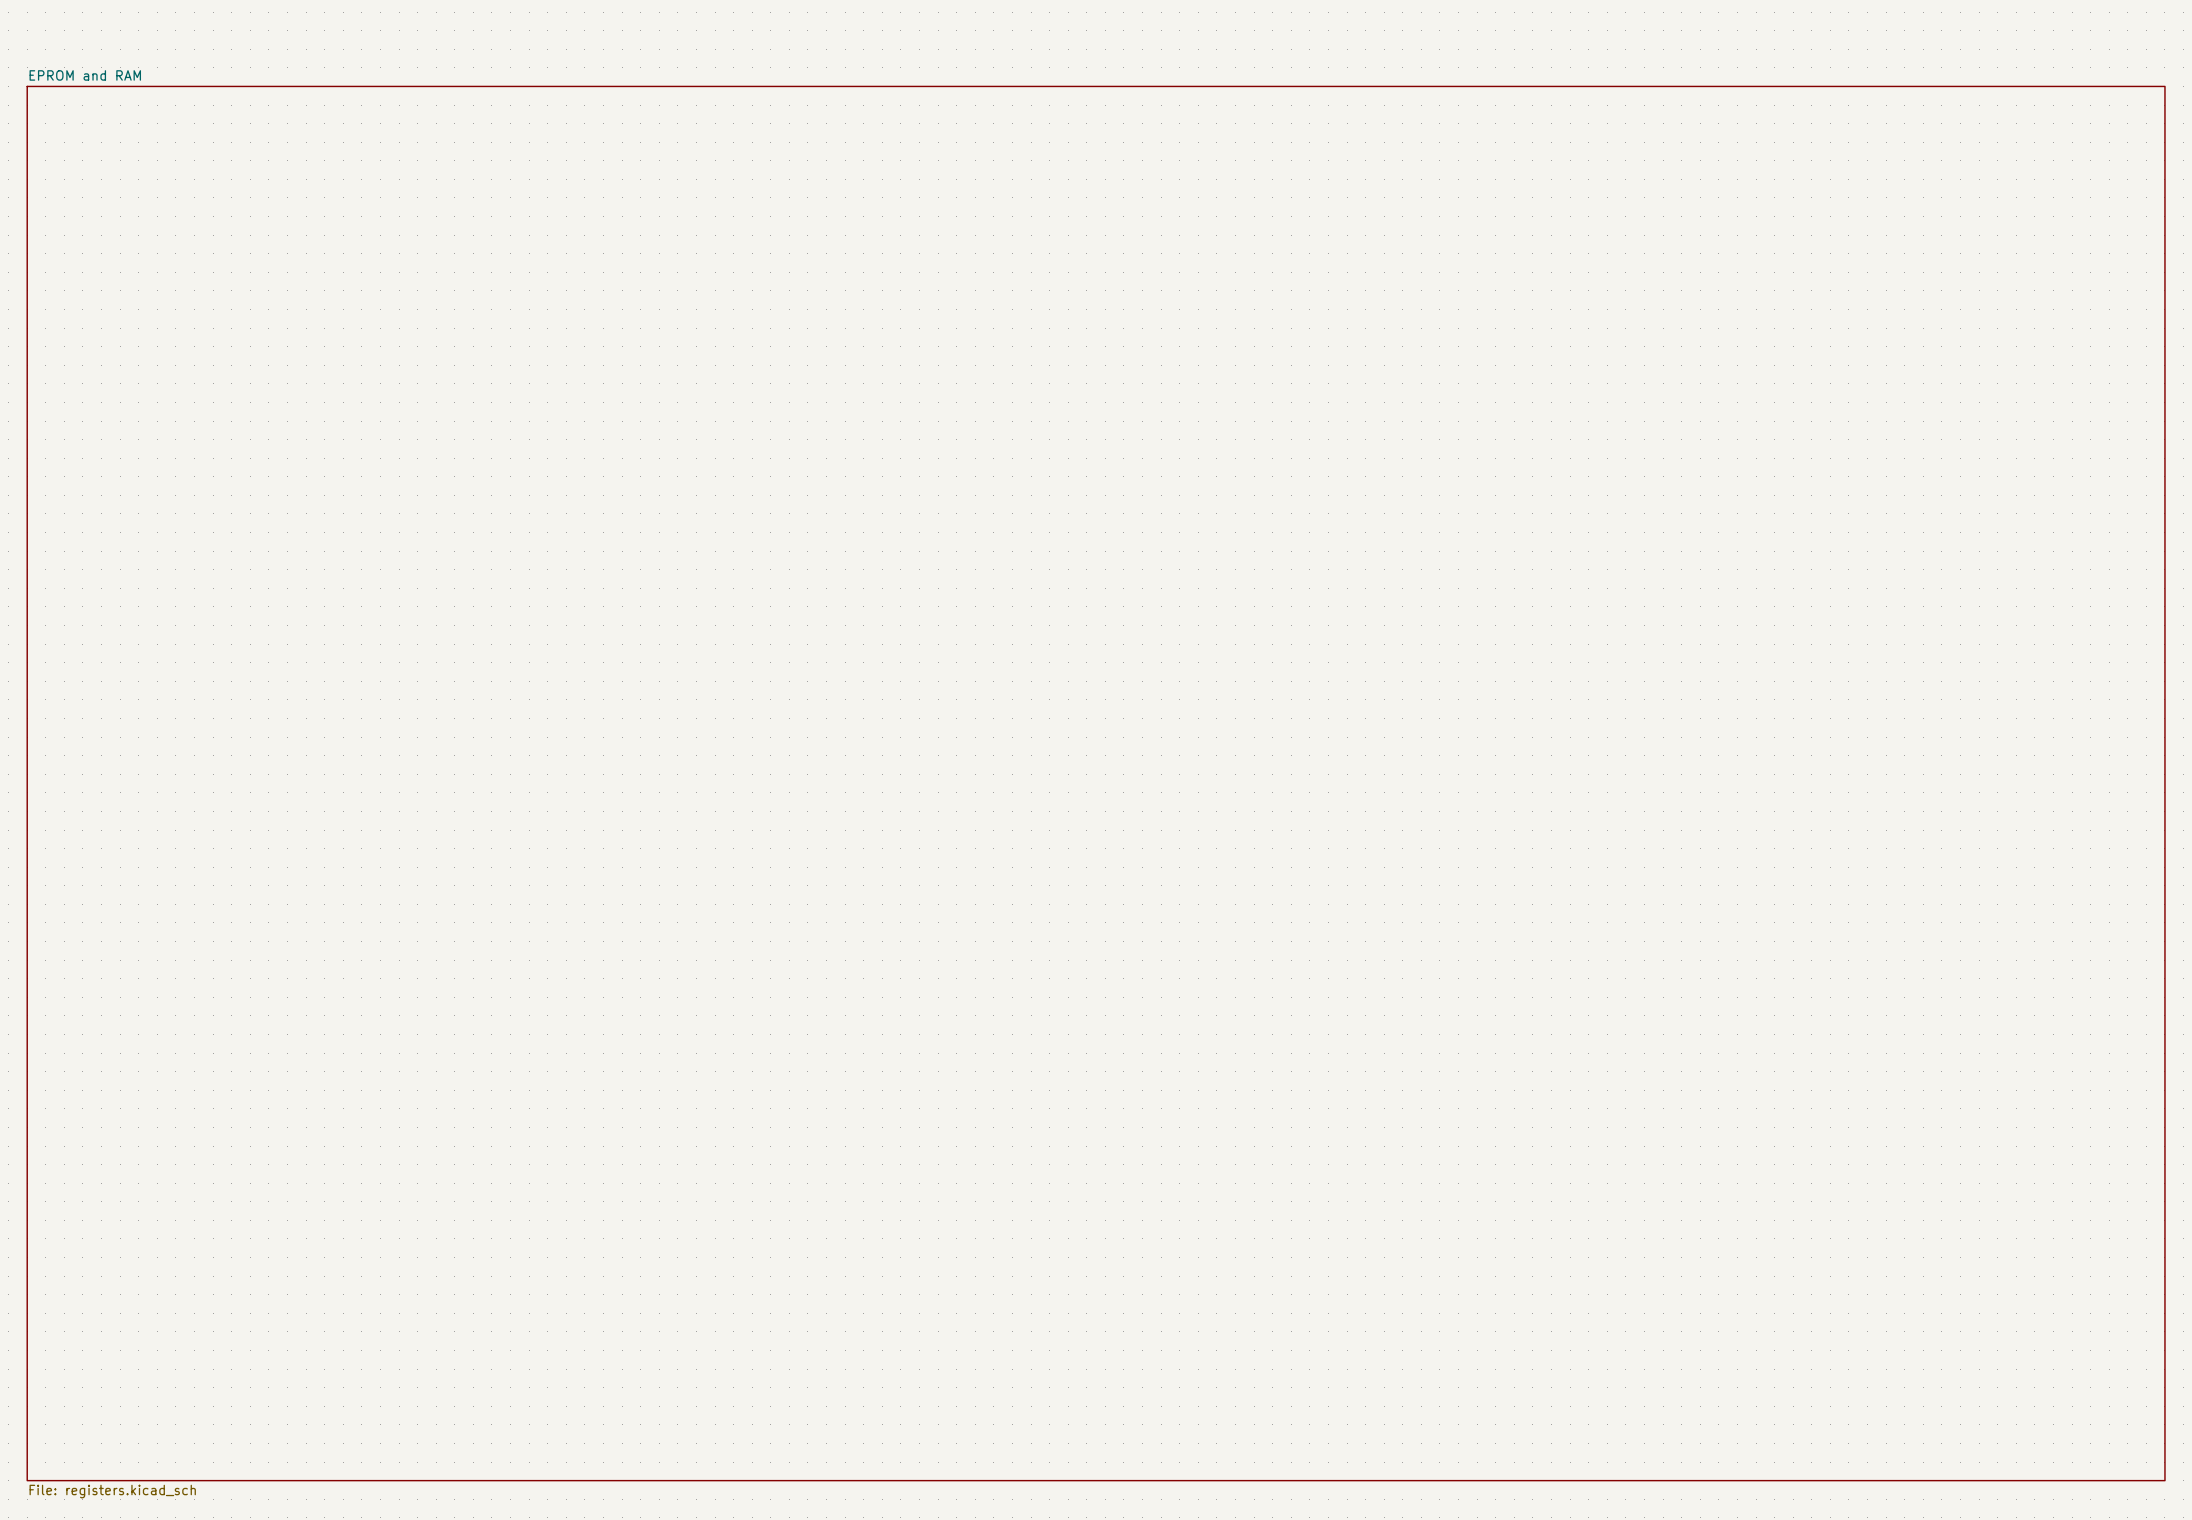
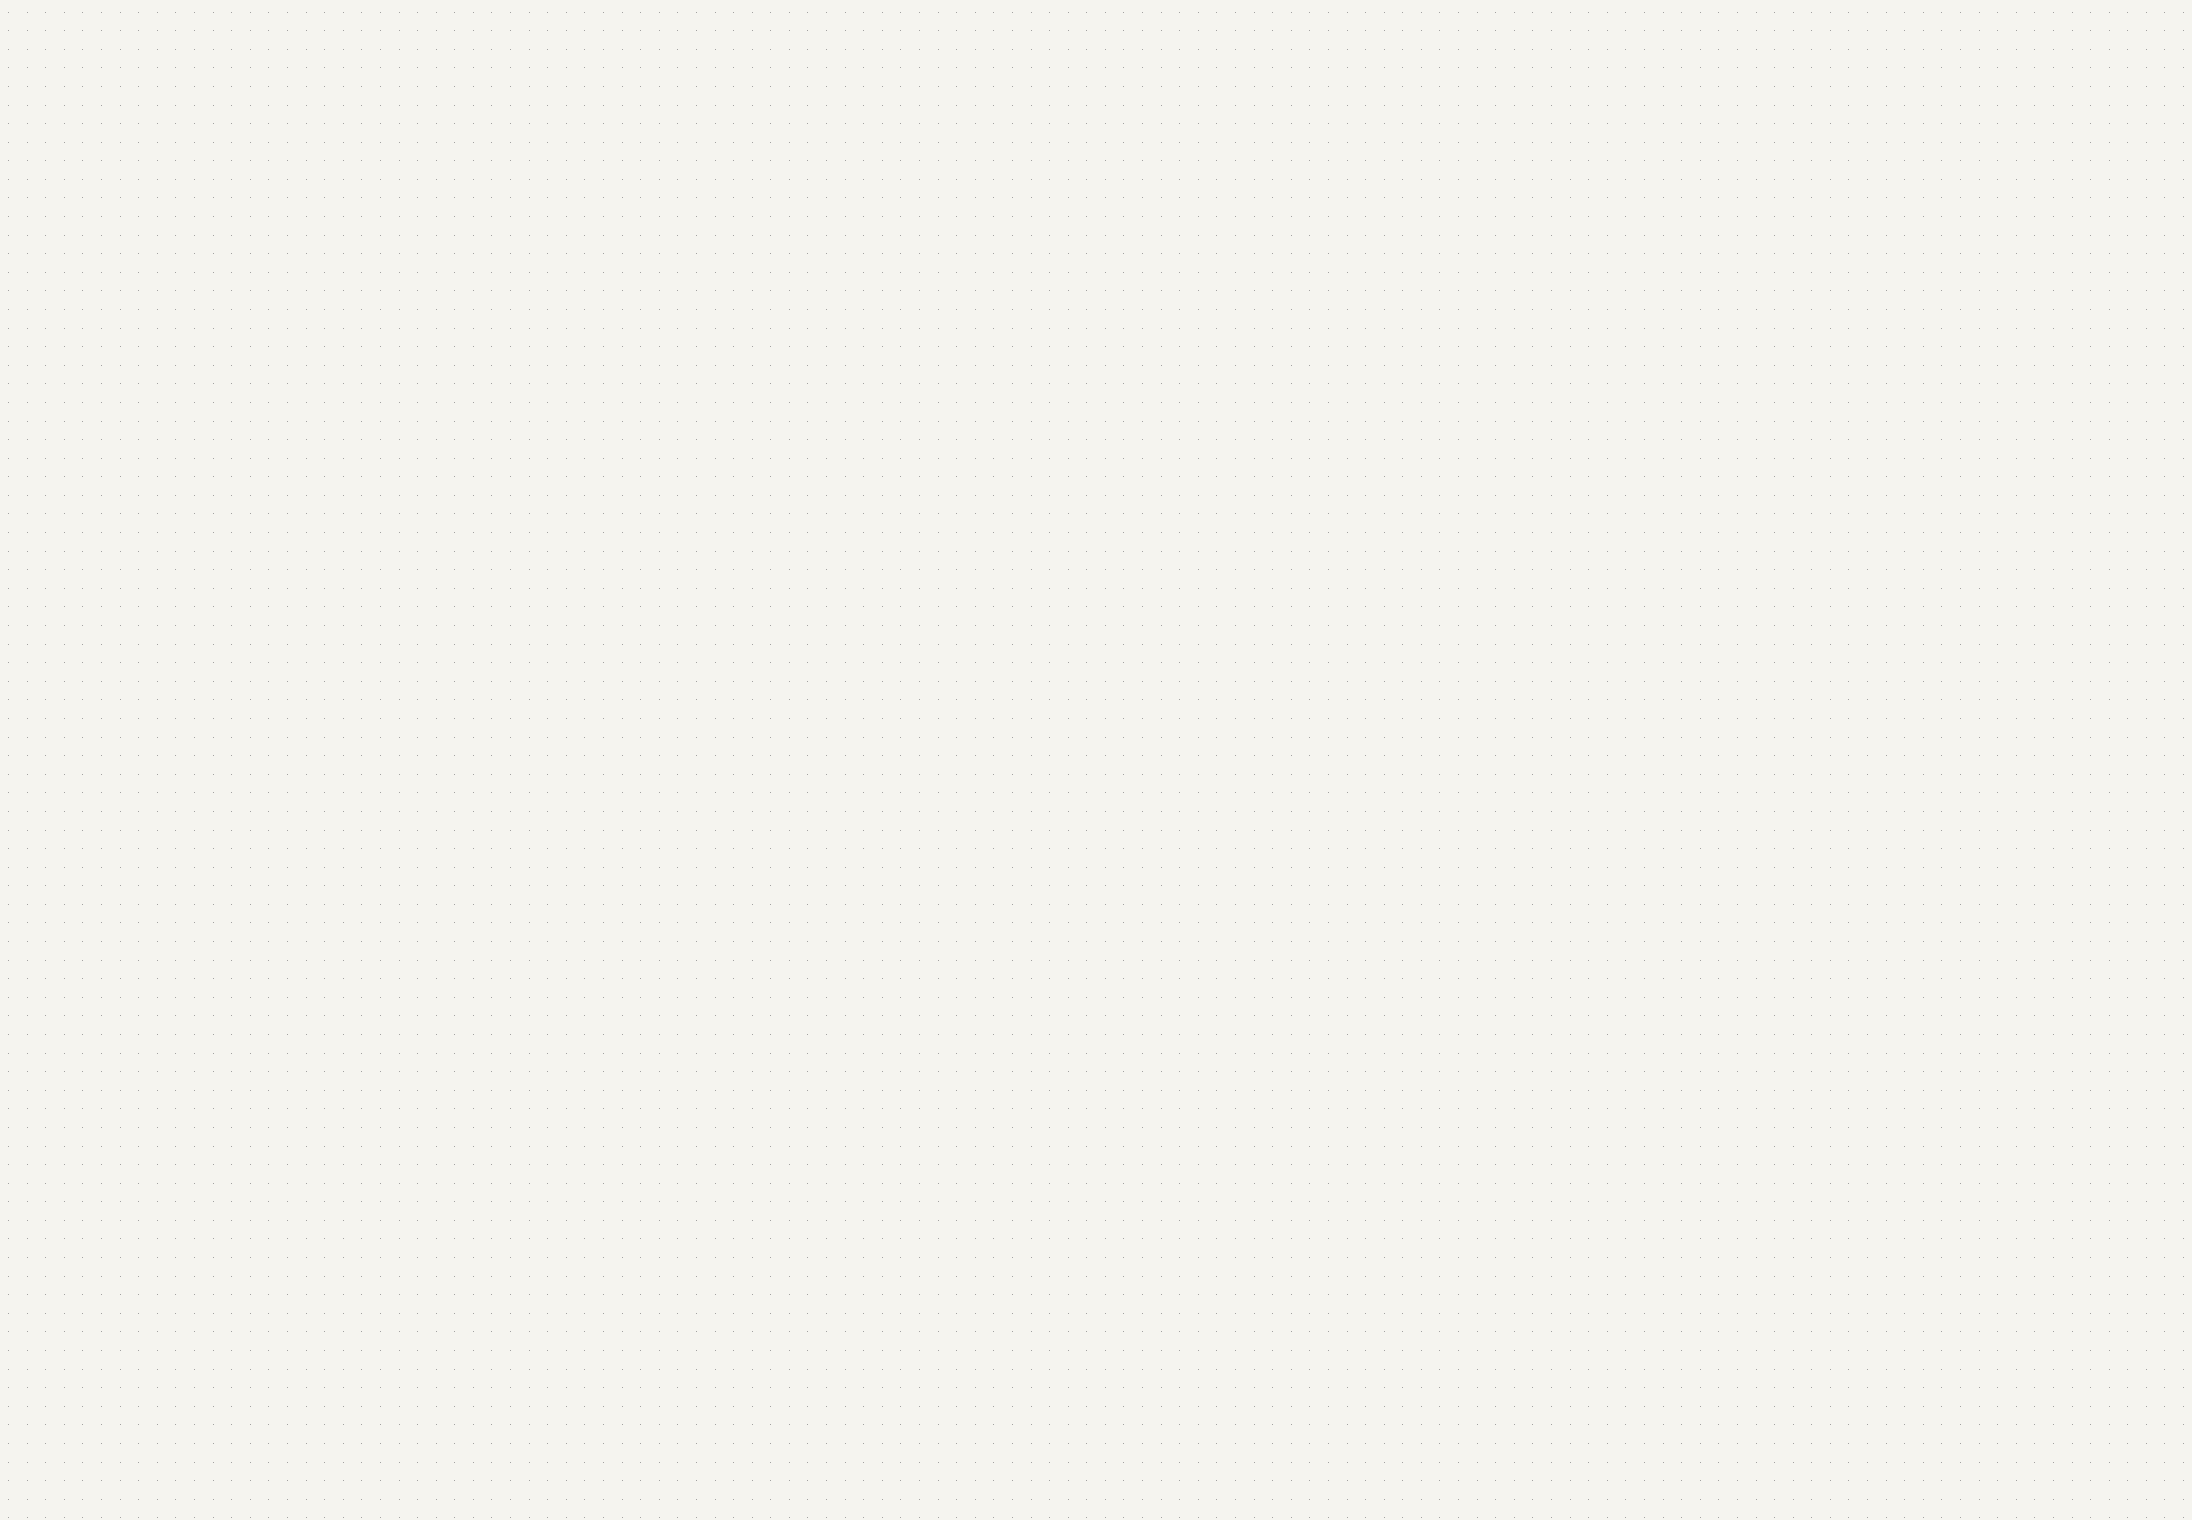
sheet EPROM and RAM: File: registers.kicad_sch (1096, 783) -> none

